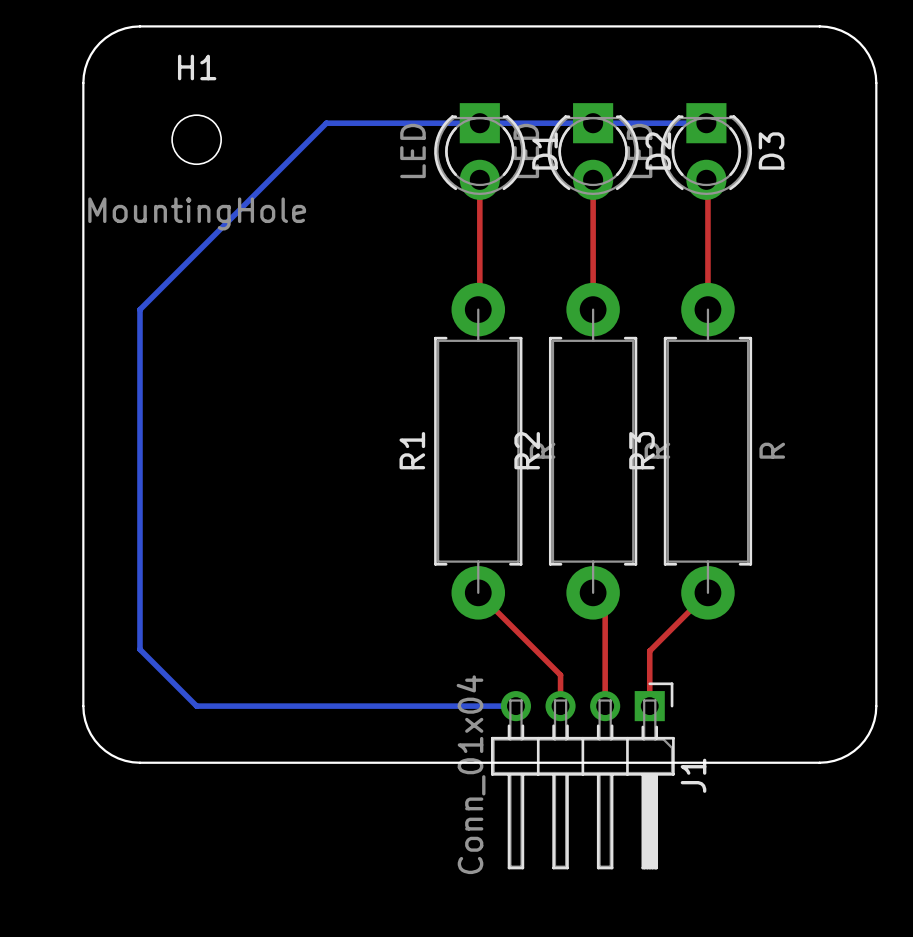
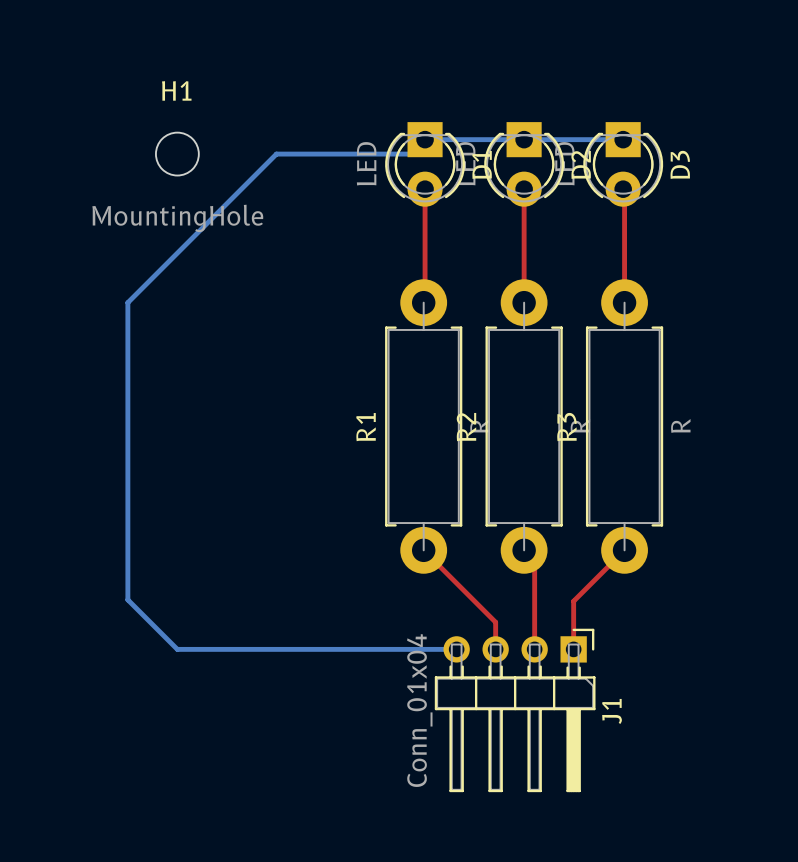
board edge: (139, 26) (819, 26) (841, 30) (859, 43) (872, 61) (876, 83) (876, 706) (872, 727) (859, 746) (841, 758) (819, 762) (139, 762) (118, 758) (99, 746) (87, 727) (83, 706) (83, 83) (87, 61) (99, 43) (118, 30) (139, 26) -> none
bottom track: (496, 123) (326, 123) (309, 139) -> (425, 154) (276, 154)

